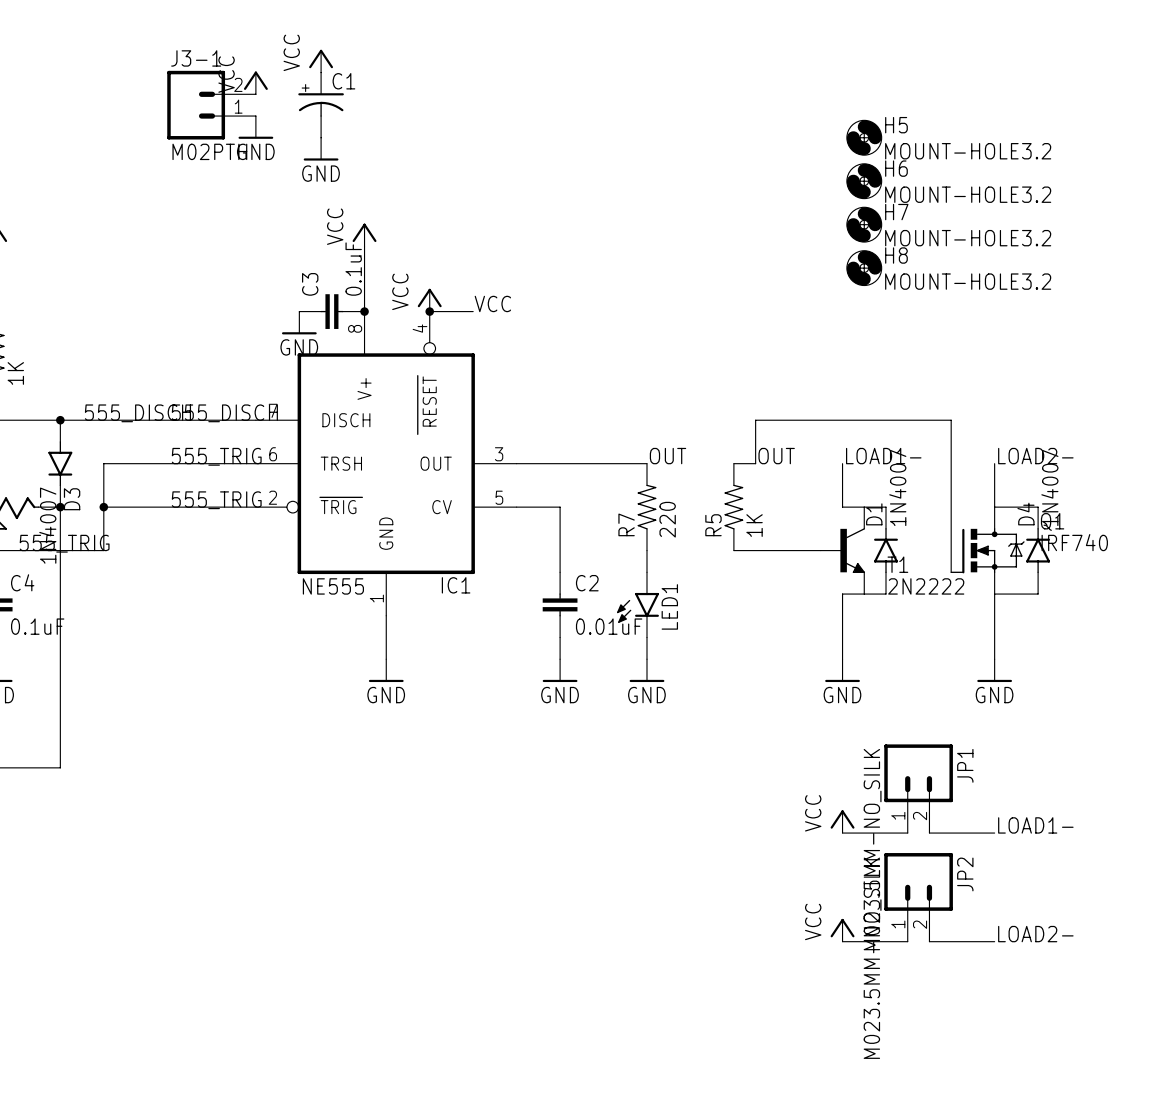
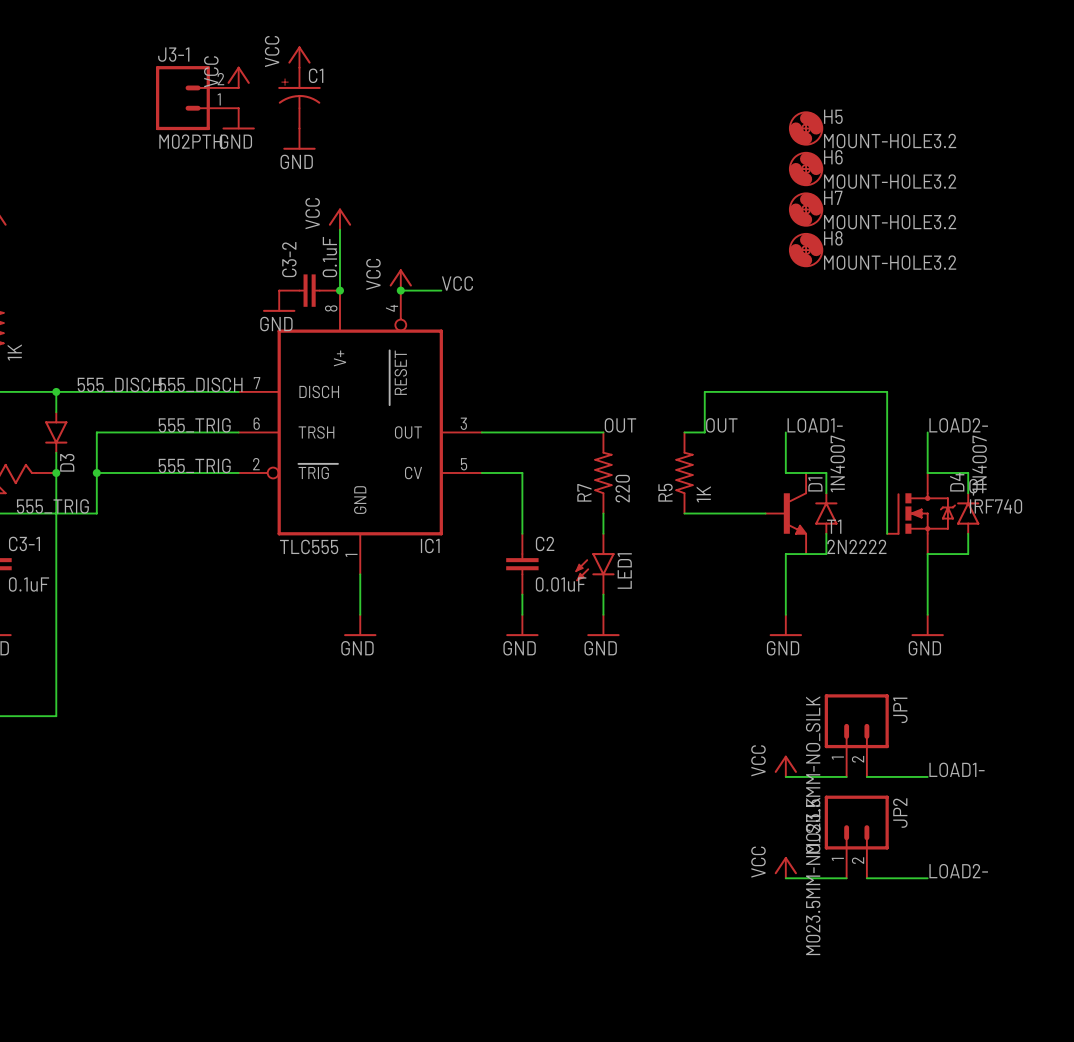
C3 name: C3 (310, 284) -> C3-2 (289, 259)
D3 value: 1N4007 (47, 525) -> none
C4 name: C4 (22, 582) -> C3-1 (24, 543)
IC1 value: NE555 (333, 586) -> TLC555 (309, 546)

